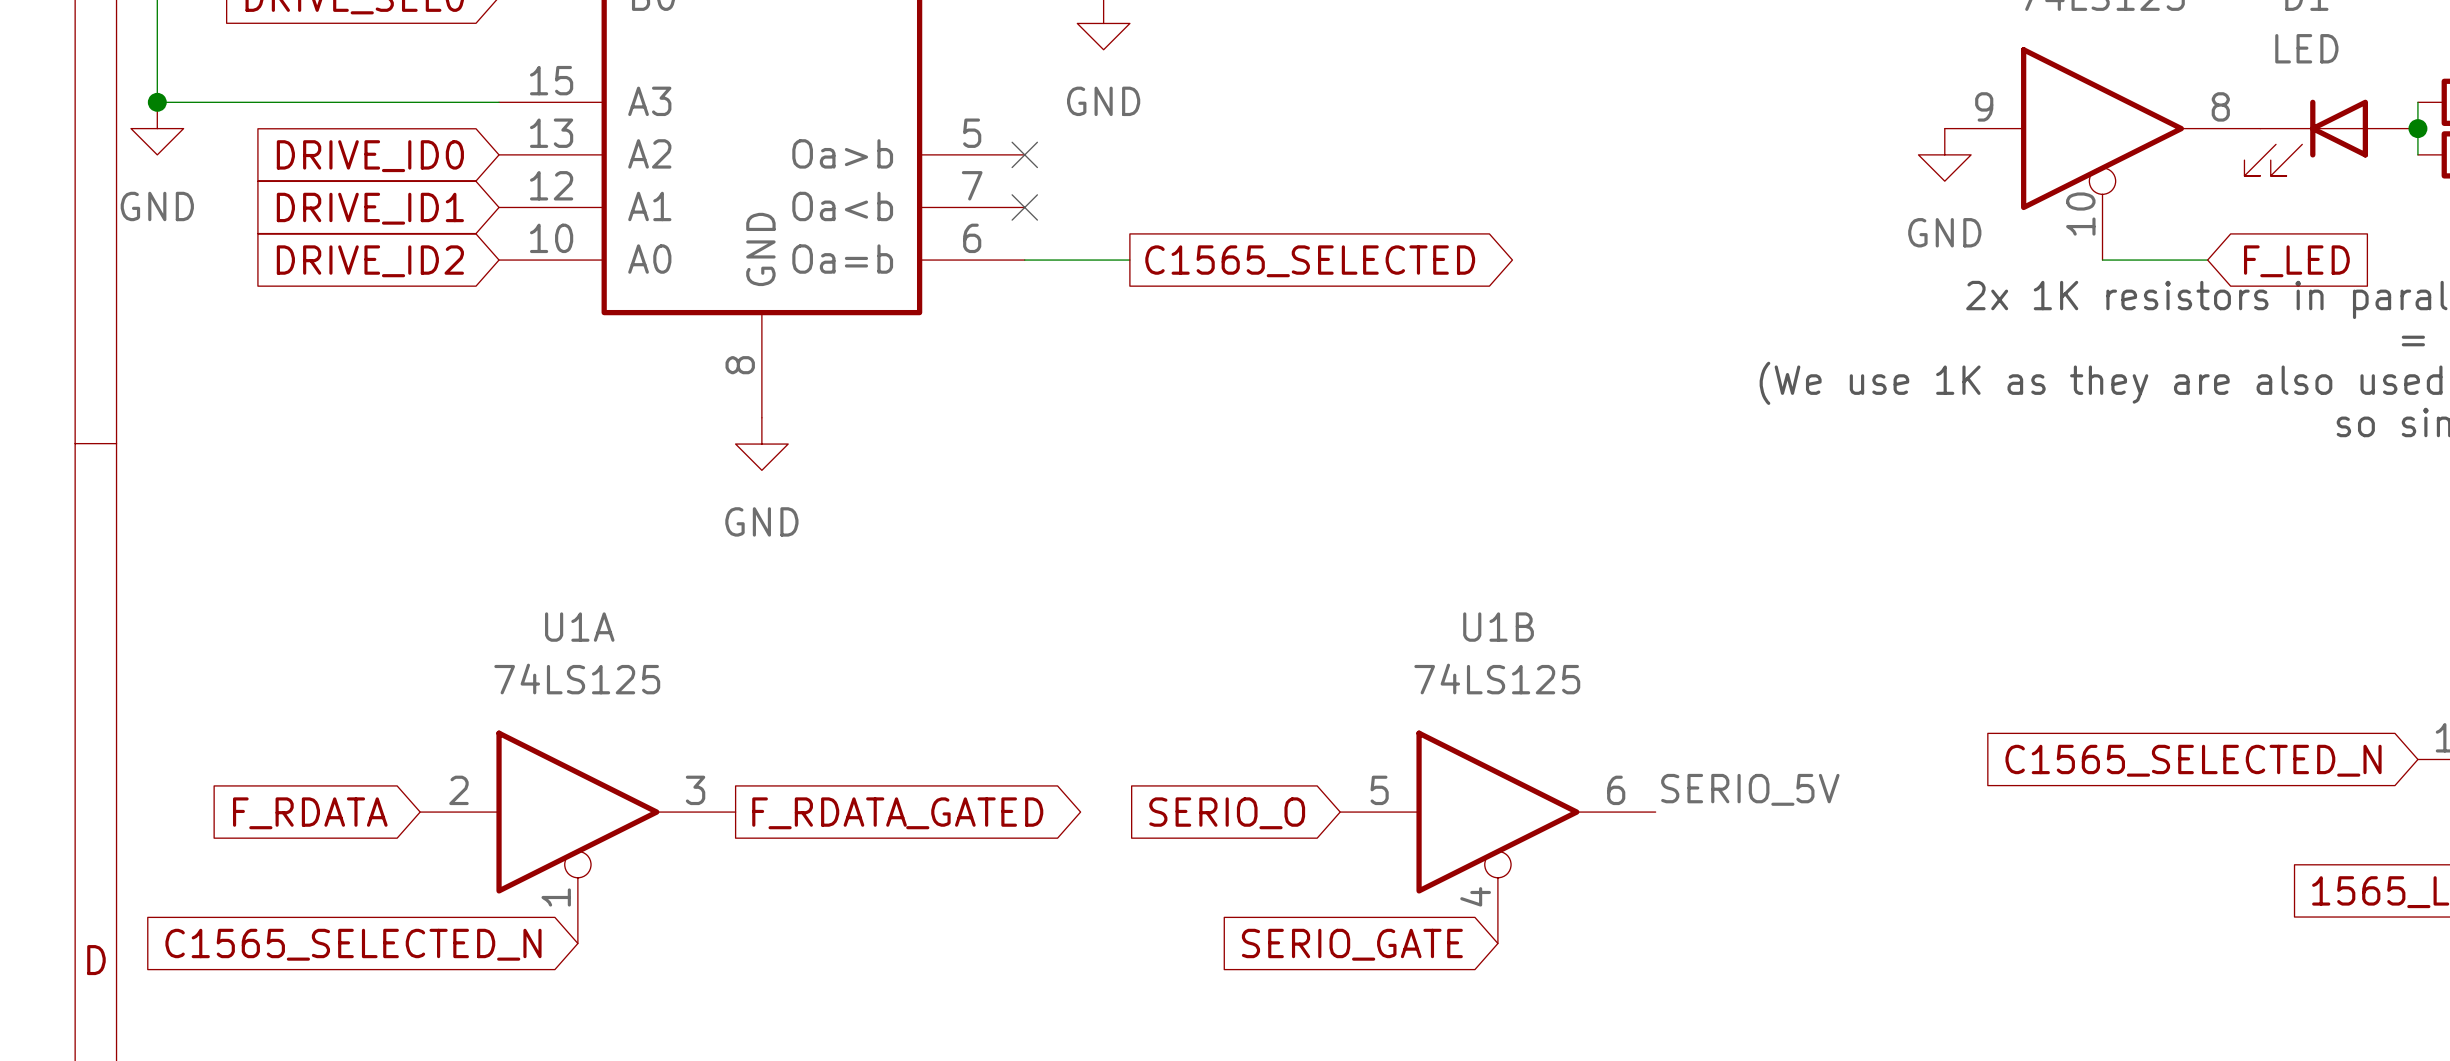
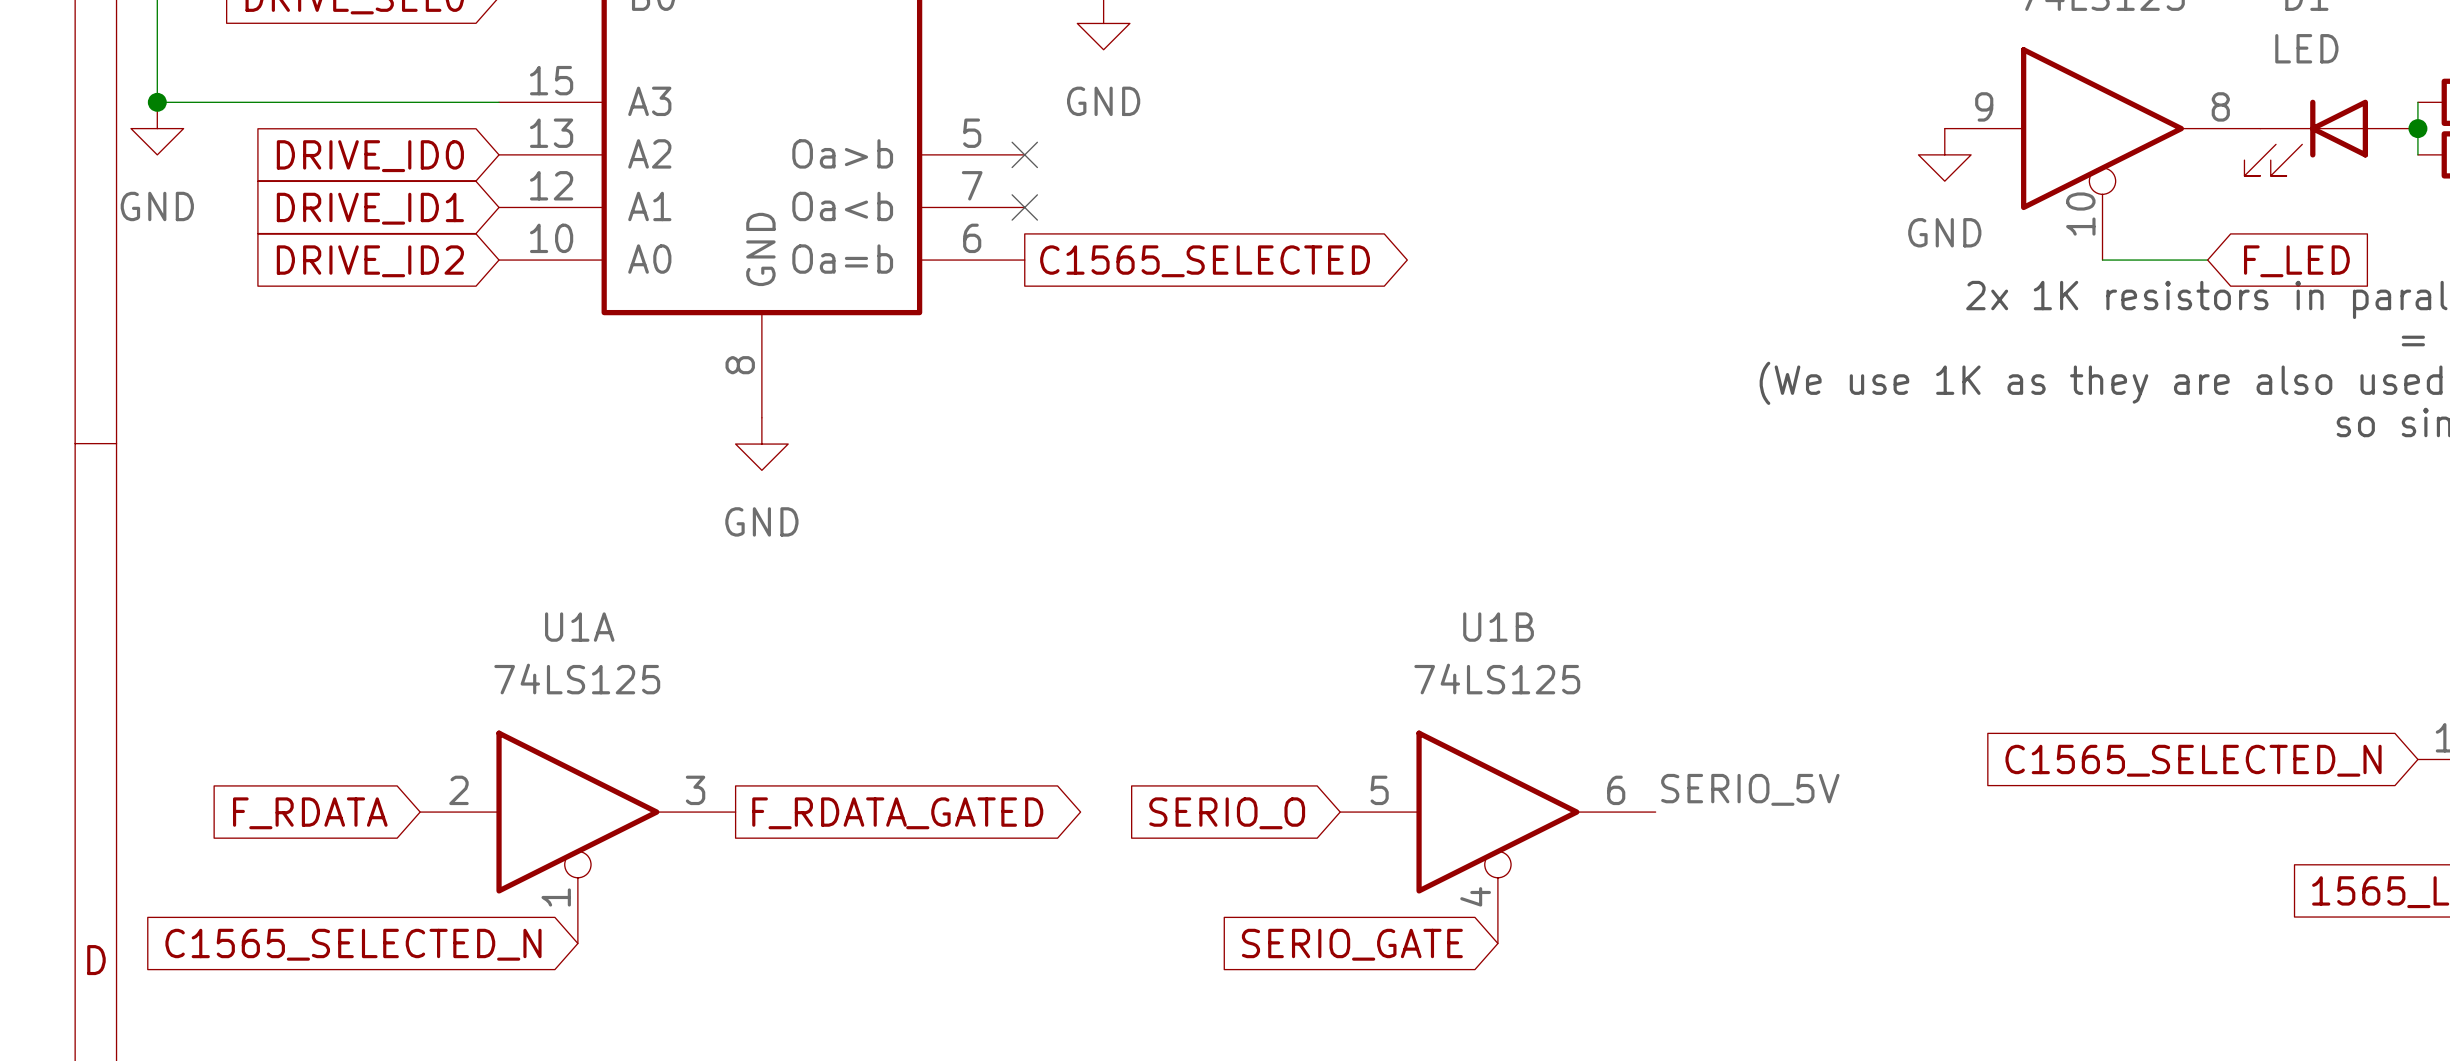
wire: (1024, 260) (1129, 260) -> none
global label position: C1565_SELECTED (1310, 261) -> C1565_SELECTED (1205, 261)

